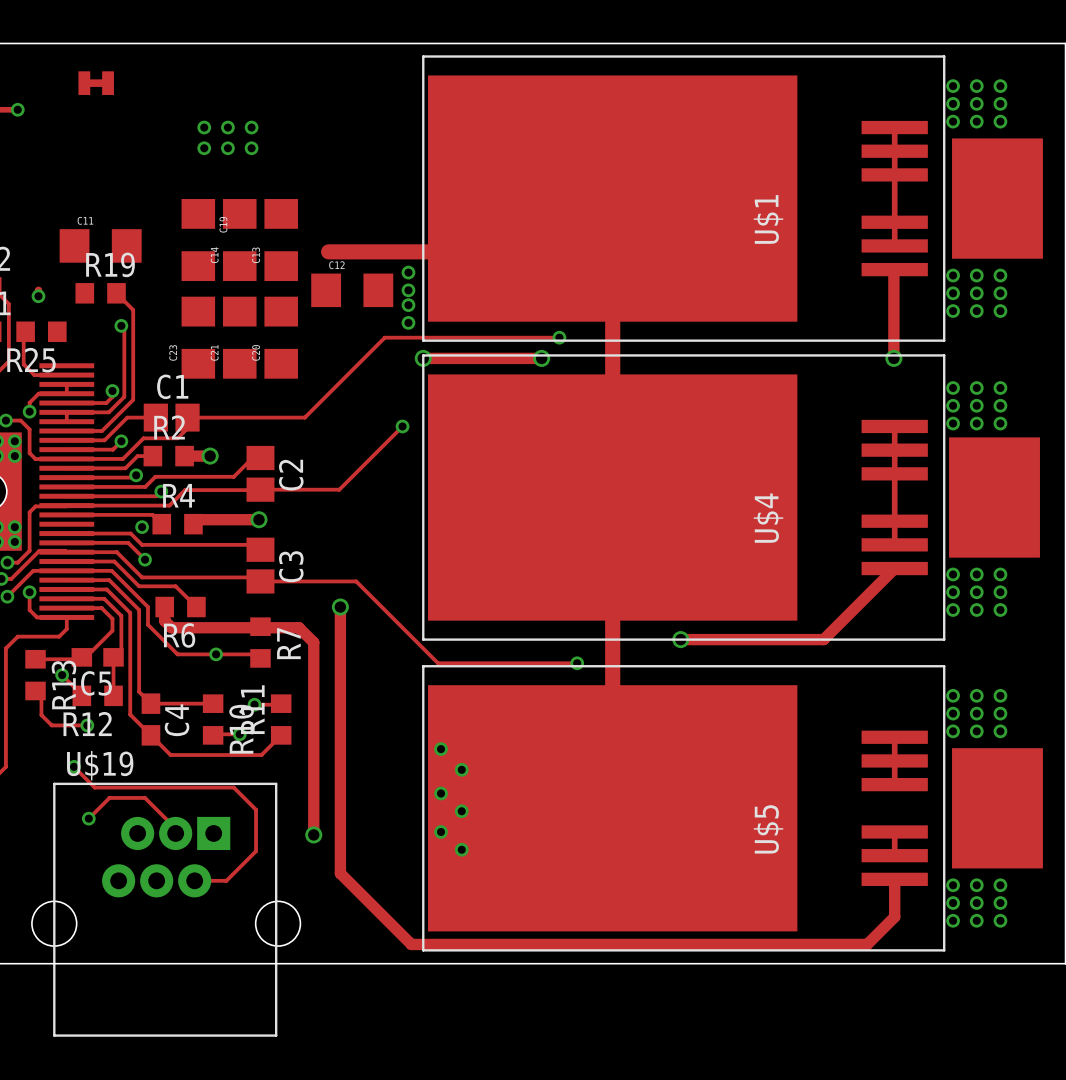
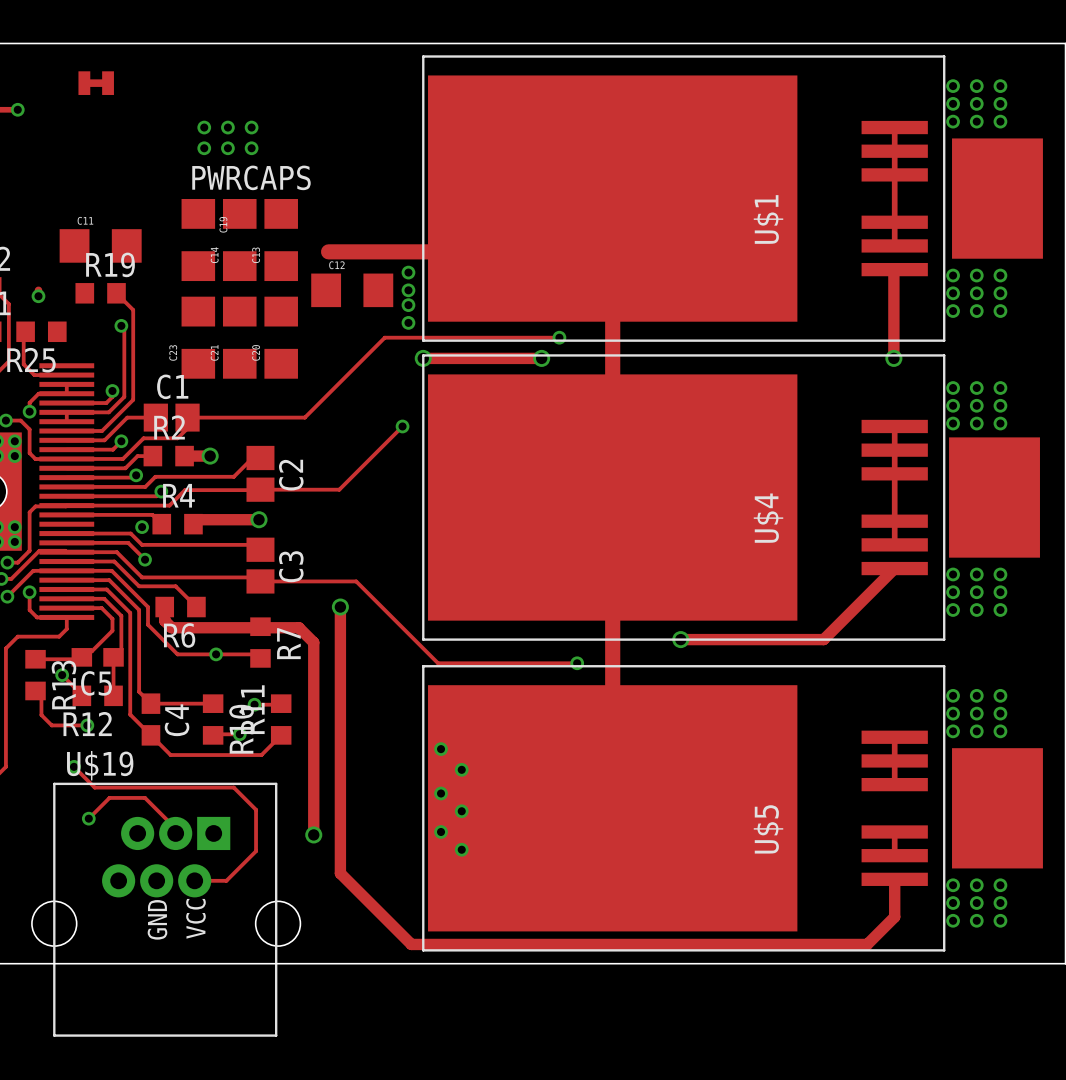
text: none -> PWRCAPS (251, 177)
text: none -> VCC (195, 918)
text: none -> GND (157, 919)

